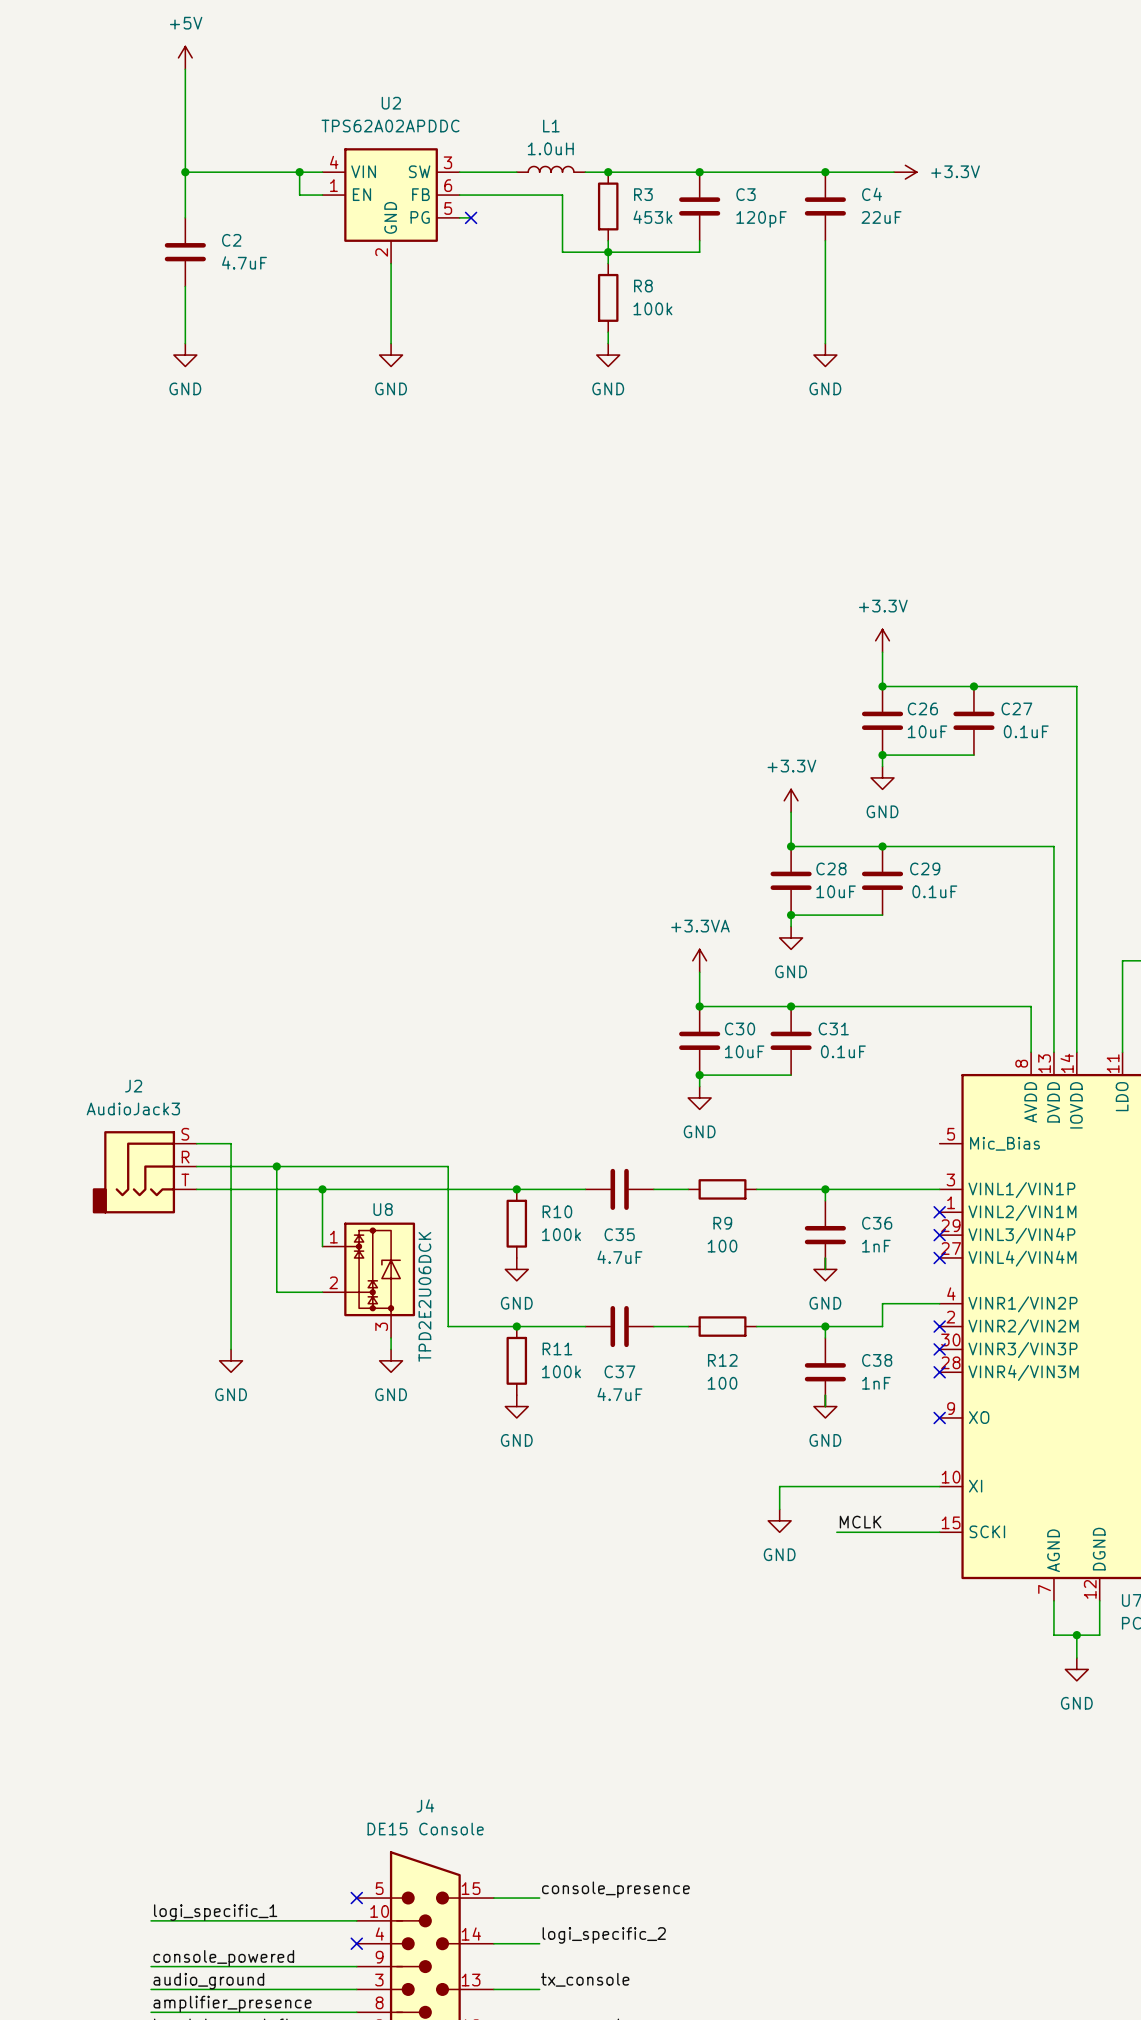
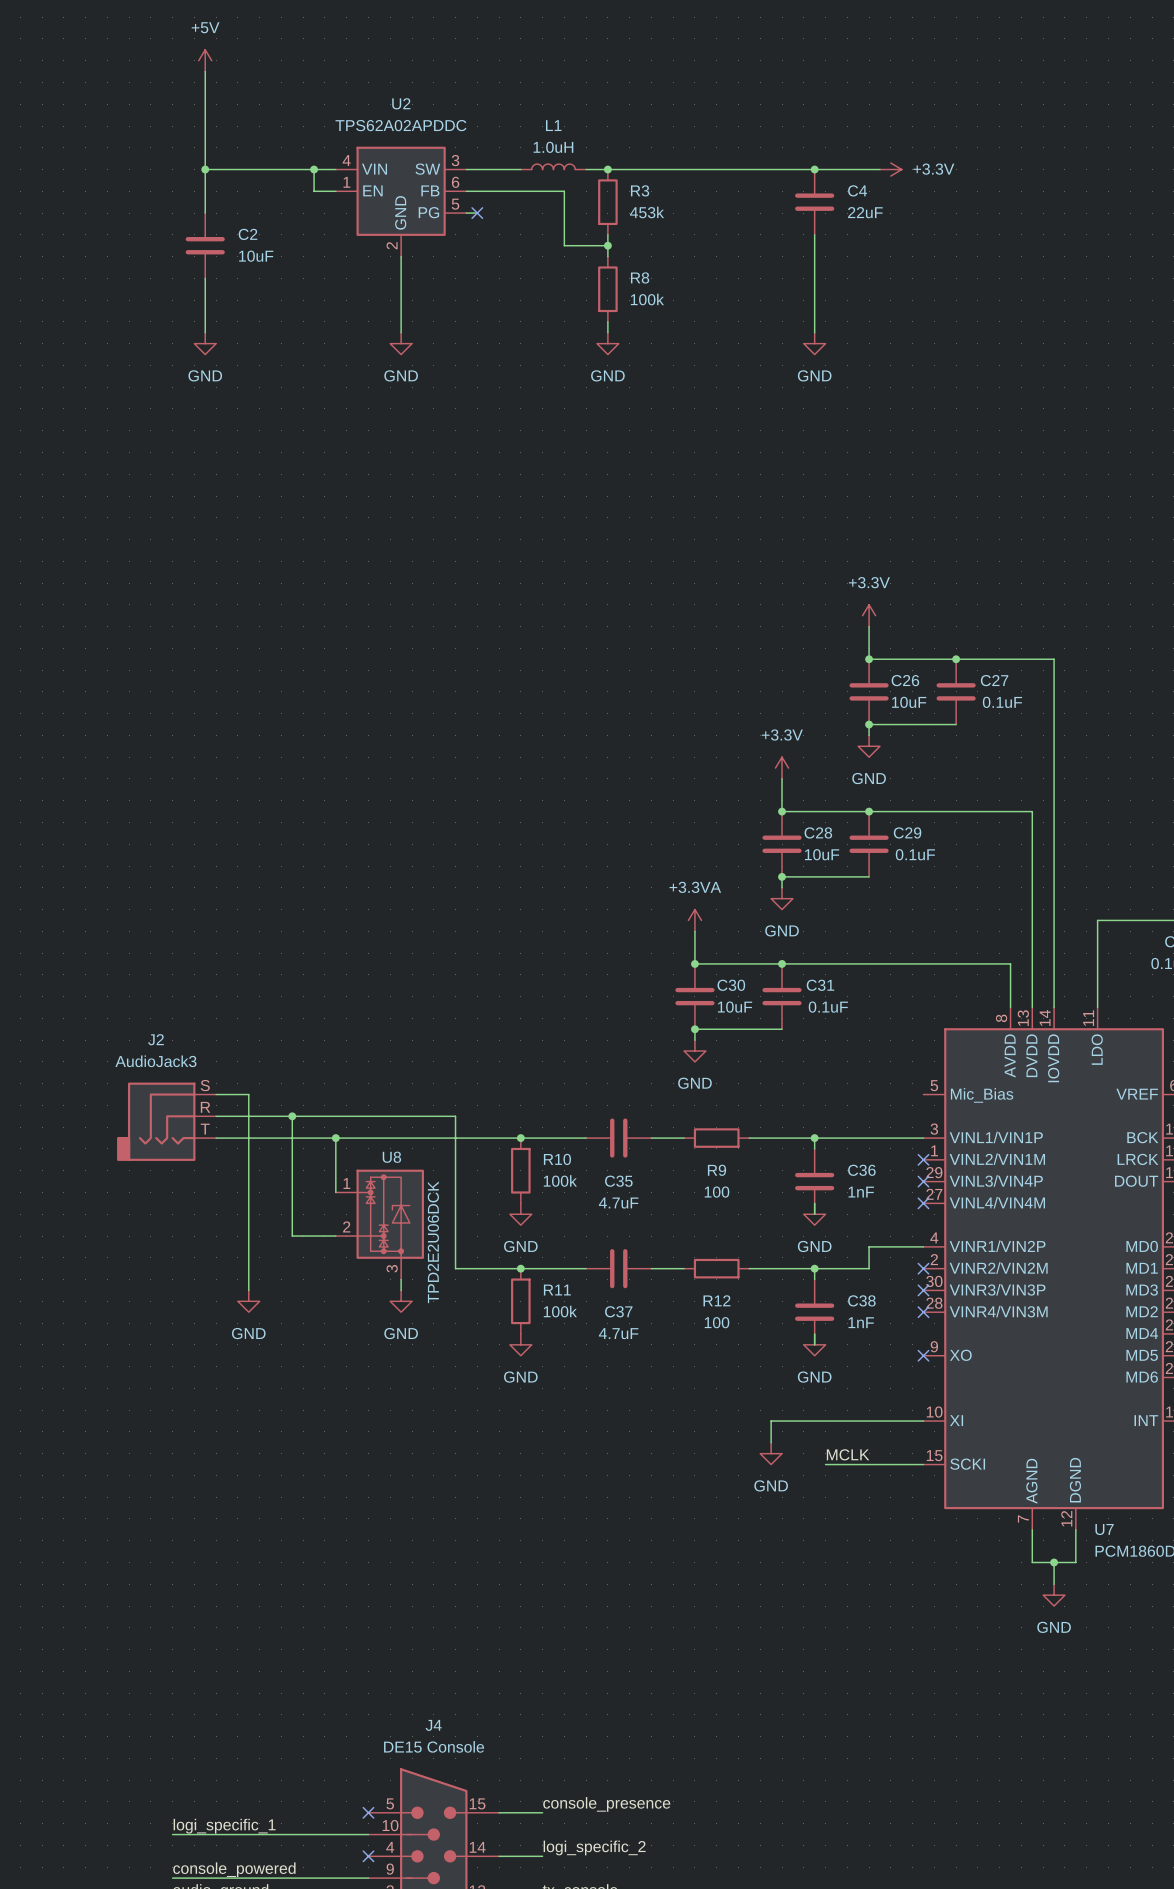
junction: (699, 172) -> none
C3: 120pF (699, 206) -> none
wire: (699, 240) (699, 252) (608, 252) -> none
C2 value: 4.7uF (244, 262) -> 10uF (256, 256)

